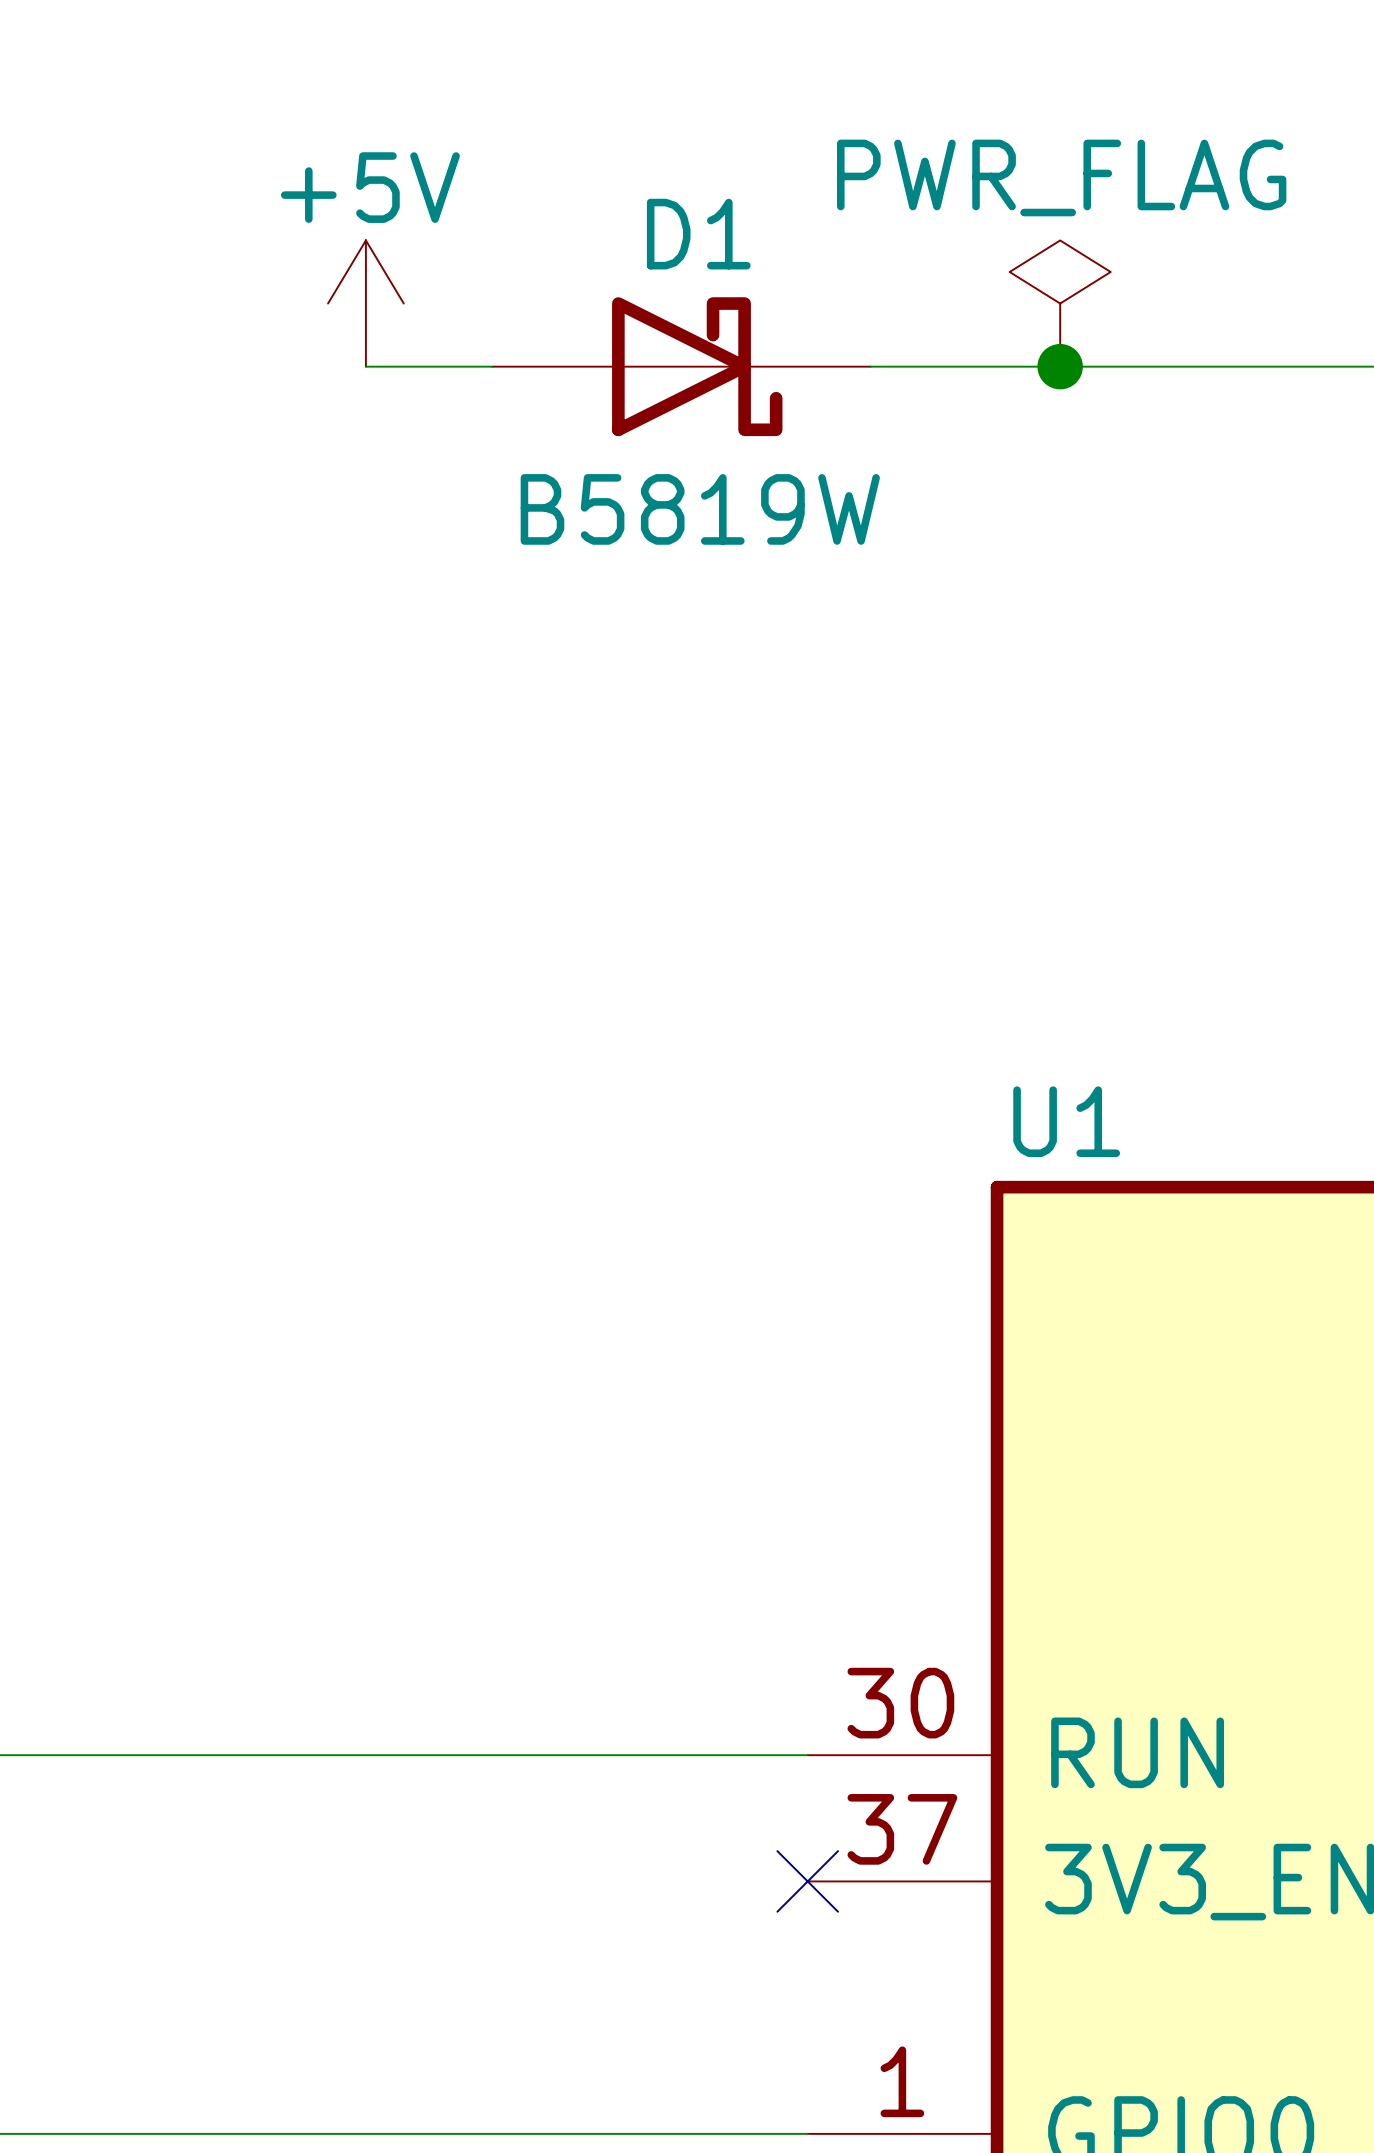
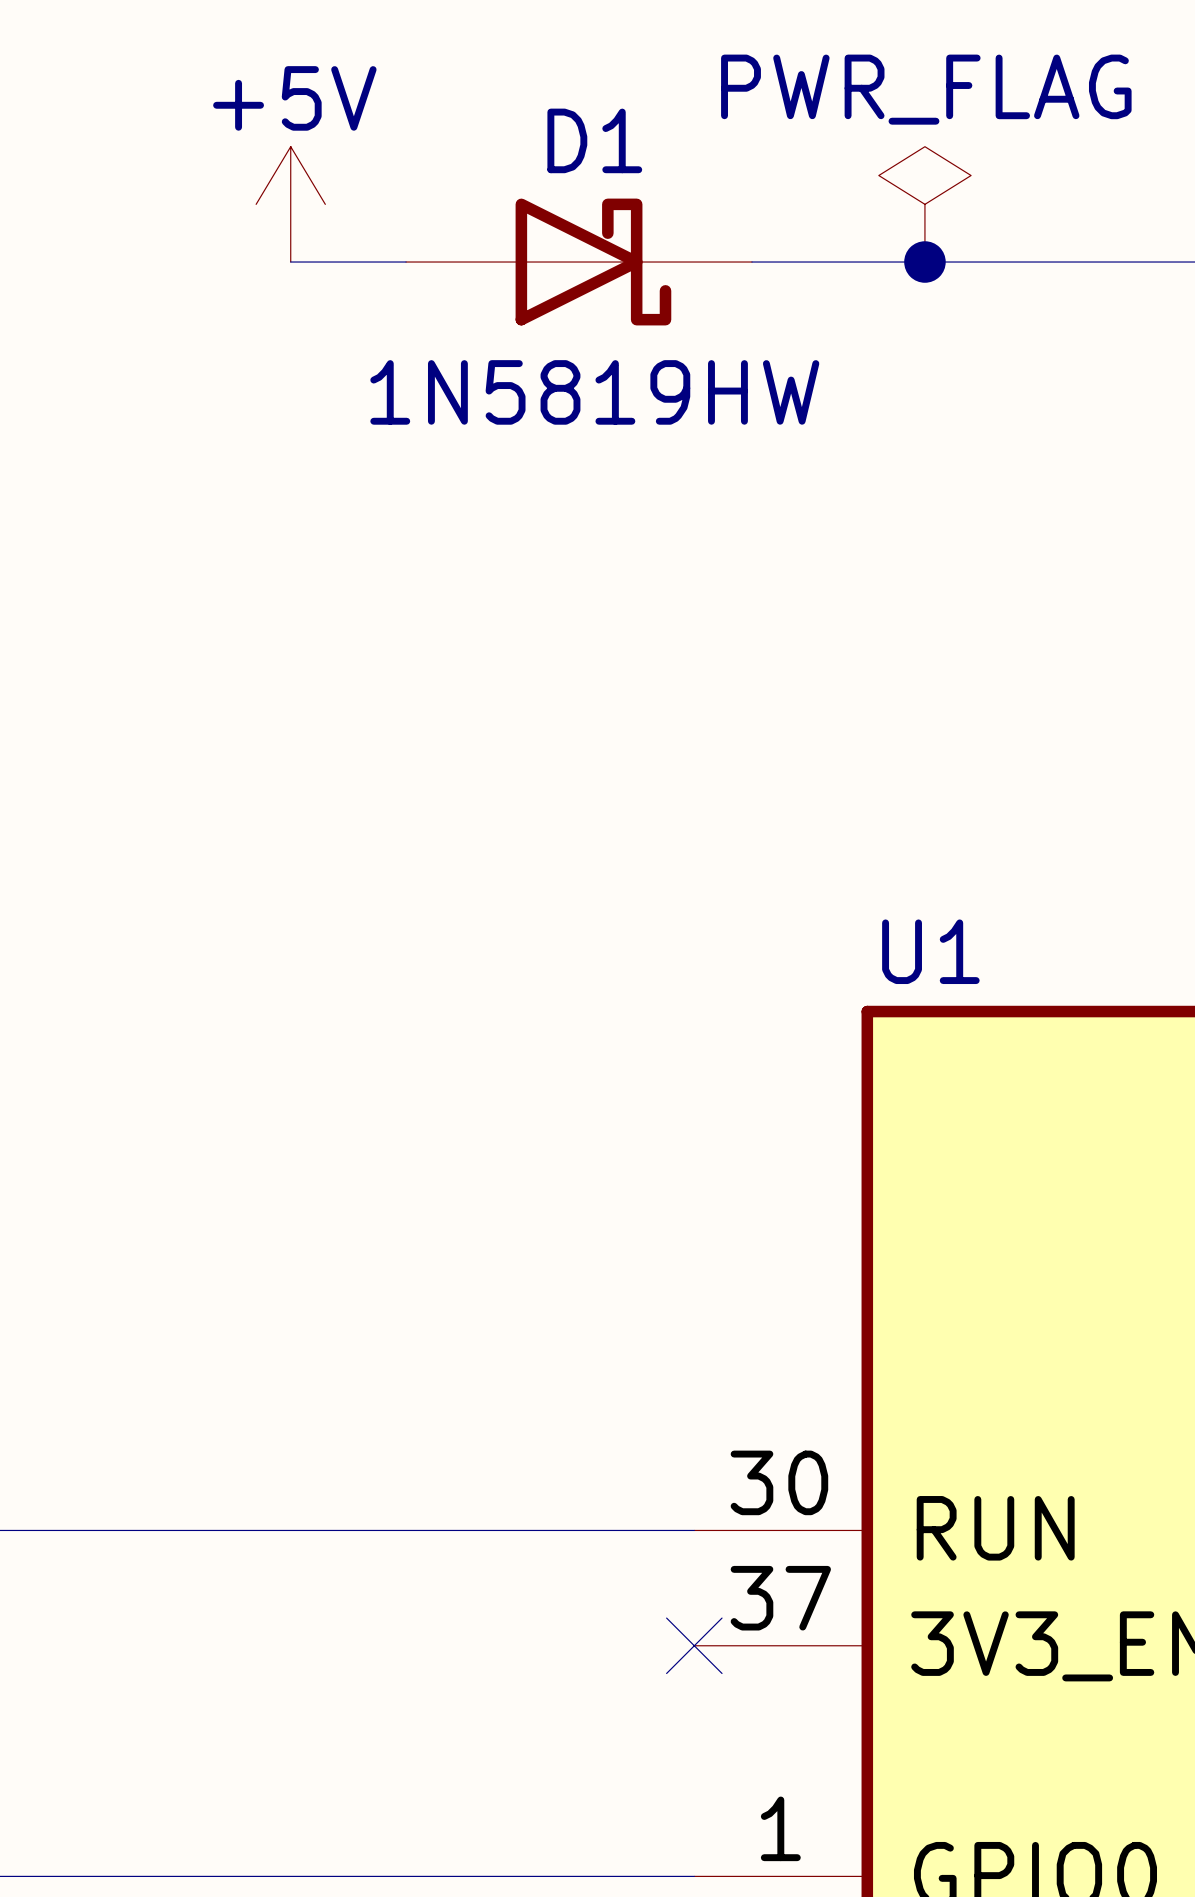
D1 value: B5819W (700, 509) -> 1N5819HW (594, 392)

